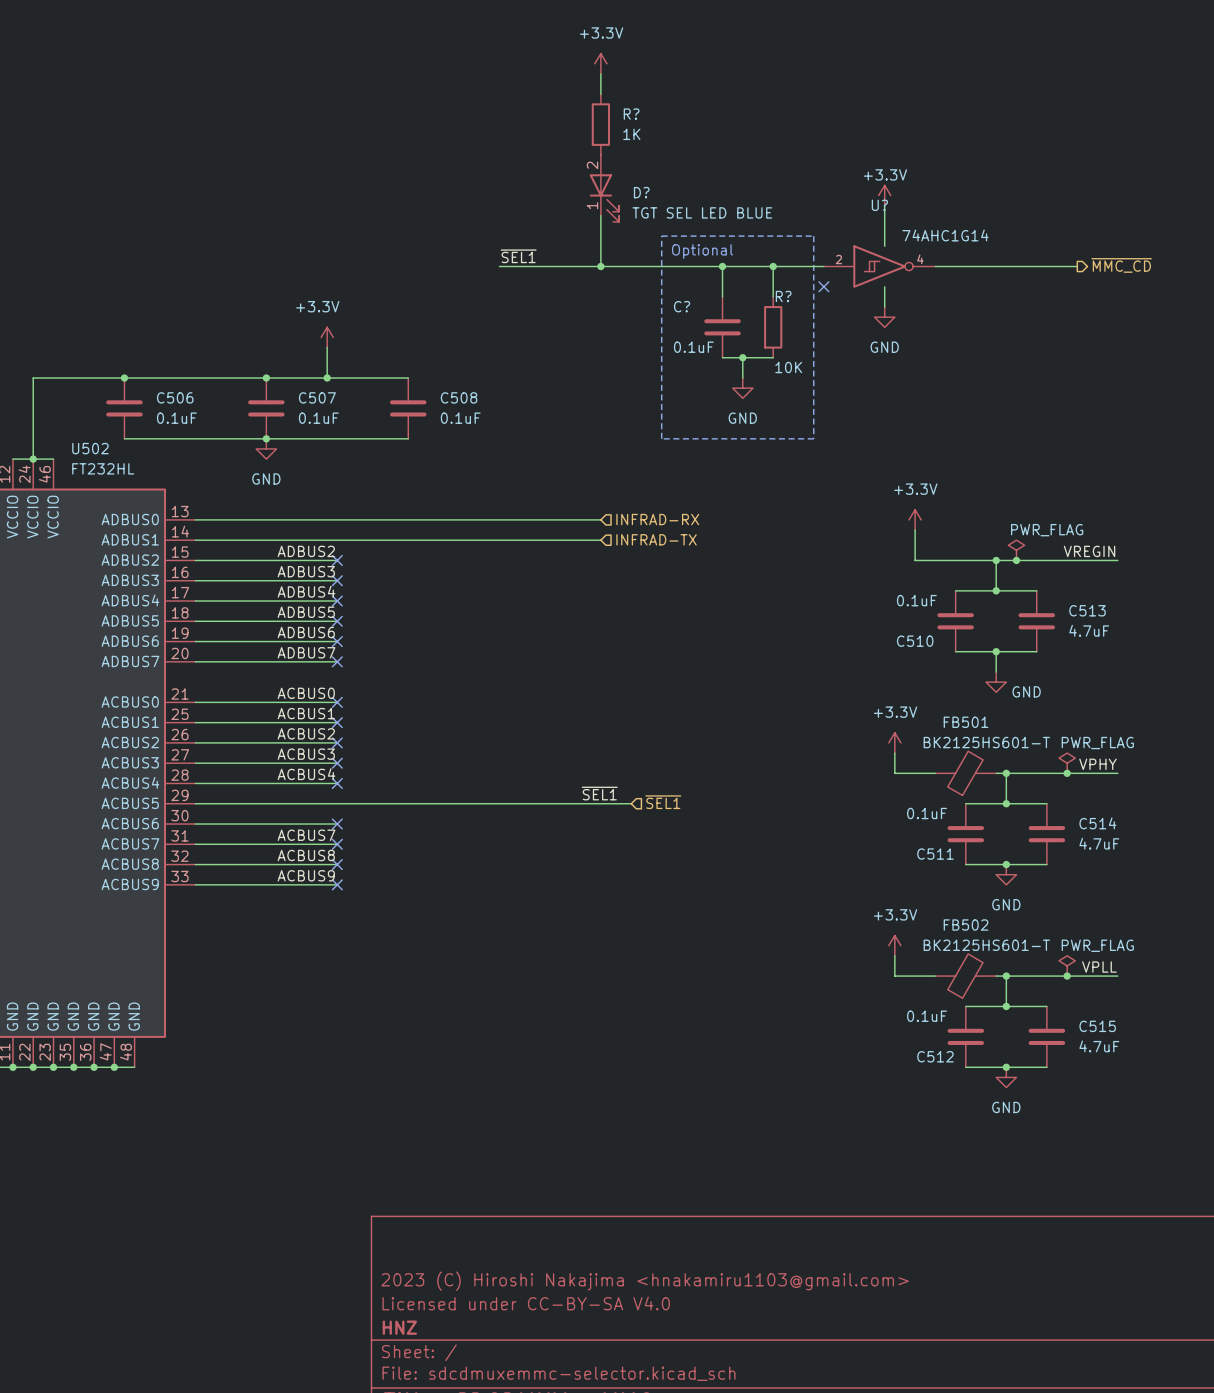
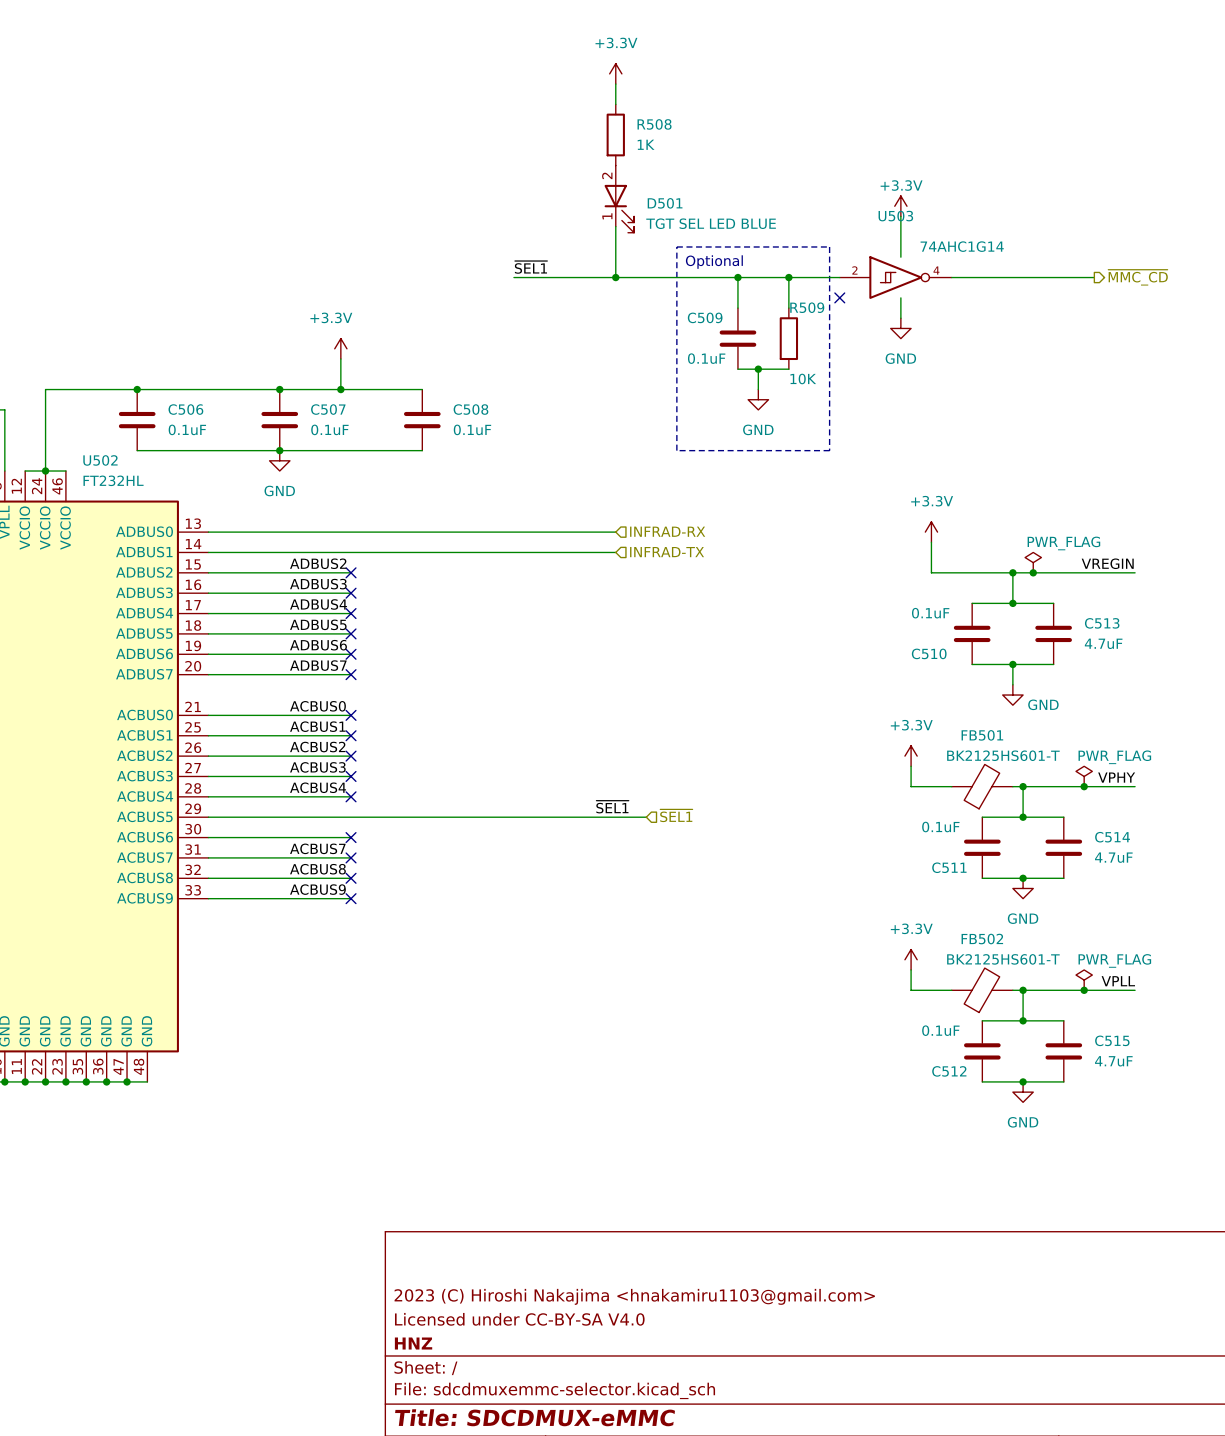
R? name: R? (631, 114) -> R508 (654, 124)
D? name: D? (641, 192) -> D501 (665, 203)
U? name: U? (879, 205) -> U503 (895, 216)
R? name: R? (783, 296) -> R509 (807, 307)
C? name: C? (682, 306) -> C509 (705, 317)

